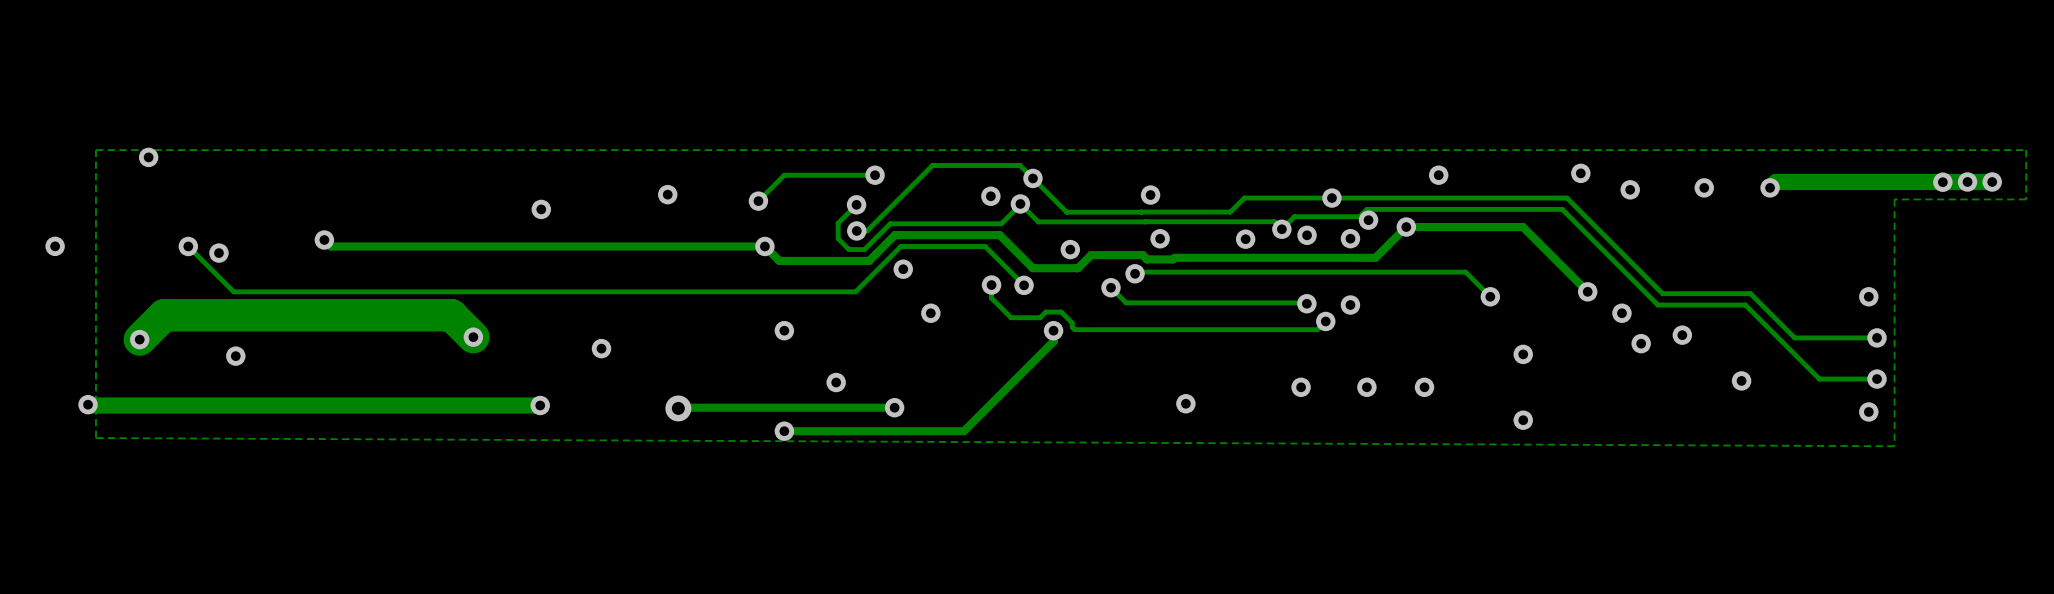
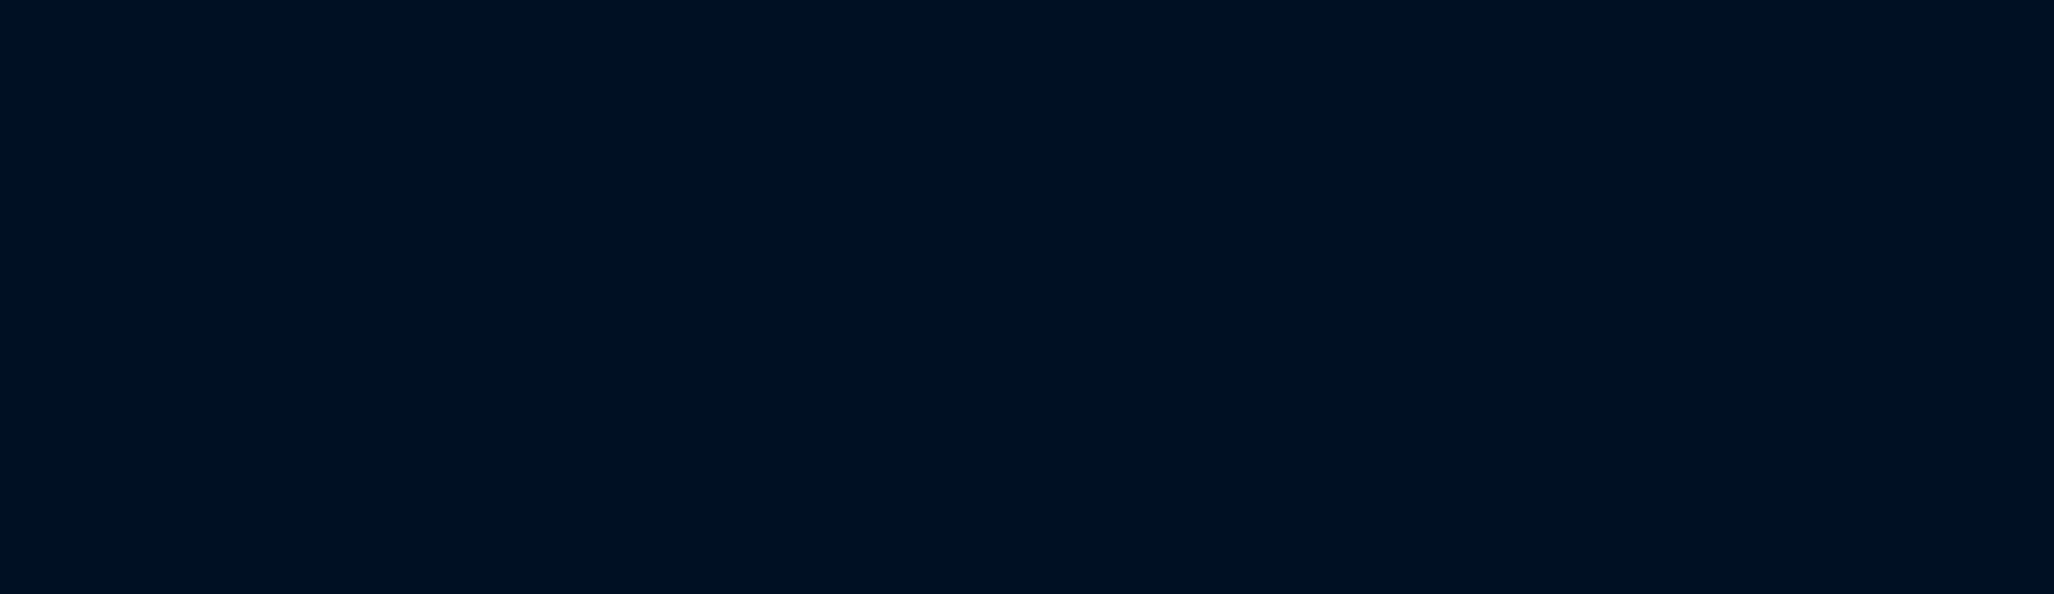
zone outline: (2026, 150) (2026, 199) (1894, 199) (1894, 446) (95, 438) (95, 150) (2026, 150) -> none
via: (148, 157) -> none
via: (1580, 173) -> none
track: (875, 175) (784, 175) (758, 201) -> none
via: (875, 175) -> none
via: (1438, 175) -> none
via: (1032, 178) -> none
via: (1967, 181) -> none
track: (1992, 181) (1775, 181) (1770, 187) -> none
via: (1992, 181) -> none
via: (1942, 182) -> none
via: (1704, 187) -> none
via: (1770, 187) -> none
via: (1630, 189) -> none
via: (667, 194) -> none
via: (1150, 195) -> none
via: (990, 196) -> none
via: (1331, 198) -> none
via: (758, 201) -> none
via: (1020, 203) -> none
track: (856, 204) (838, 223) (838, 238) (849, 249) (864, 249) (890, 223) (1001, 223) (1020, 203) (1038, 221) (1274, 221) (1281, 229) (1294, 216) (1359, 216) (1366, 209) (1562, 209) (1657, 305) (1745, 305) (1819, 379) (1877, 379) -> none
via: (856, 204) -> none
via: (541, 209) -> none
via: (1368, 220) -> none
via: (1406, 227) -> none
via: (1281, 229) -> none
track: (856, 230) (867, 230) (932, 165) (1020, 165) (1066, 212) (1230, 212) (1244, 198) (1566, 198) (1662, 293) (1750, 293) (1794, 337) (1877, 337) -> none
via: (856, 230) -> none
via: (1307, 235) -> none
via: (1160, 238) -> none
via: (1350, 238) -> none
via: (1245, 239) -> none
track: (324, 240) (330, 246) (764, 246) (779, 260) (869, 260) (894, 235) (999, 235) (1032, 268) (1078, 268) (1091, 255) (1142, 255) (1147, 259) (1375, 257) (1406, 227) (1522, 227) (1587, 291) -> none
via: (324, 240) -> none
via: (55, 246) -> none
track: (188, 246) (233, 291) (855, 291) (900, 246) (985, 246) (1024, 285) -> none
via: (188, 246) -> none
via: (764, 246) -> none
via: (1070, 249) -> none
via: (218, 253) -> none
via: (903, 269) -> none
track: (1135, 273) (1136, 272) (1465, 272) (1490, 296) -> none
via: (1135, 273) -> none
track: (991, 285) (991, 298) (1011, 317) (1040, 317) (1045, 312) (1061, 312) (1072, 322) (1074, 329) (1317, 329) (1325, 321) -> none
via: (991, 285) -> none
via: (1024, 285) -> none
track: (1111, 287) (1126, 302) (1306, 303) -> none
via: (1111, 287) -> none
via: (1587, 291) -> none
via: (1490, 296) -> none
via: (1868, 296) -> none
via: (1306, 303) -> none
via: (1350, 305) -> none
via: (930, 313) -> none
via: (1621, 313) -> none
via: (1325, 321) -> none
via: (784, 330) -> none
track: (1053, 330) (1053, 341) (963, 431) (784, 431) -> none
via: (1053, 330) -> none
via: (1682, 335) -> none
track: (473, 337) (451, 315) (164, 315) (139, 339) -> none
via: (473, 337) -> none
via: (1877, 337) -> none
via: (139, 339) -> none
via: (1641, 343) -> none
via: (601, 348) -> none
via: (1523, 354) -> none
via: (235, 356) -> none
via: (1877, 379) -> none
via: (1741, 380) -> none
via: (836, 382) -> none
via: (1301, 387) -> none
via: (1366, 387) -> none
via: (1424, 387) -> none
via: (1185, 403) -> none
track: (88, 404) (540, 405) -> none
via: (88, 404) -> none
via: (540, 405) -> none
track: (894, 407) (678, 408) -> none
via: (894, 407) -> none
via: (678, 408) -> none
via: (1868, 411) -> none
via: (1523, 420) -> none
via: (784, 431) -> none

